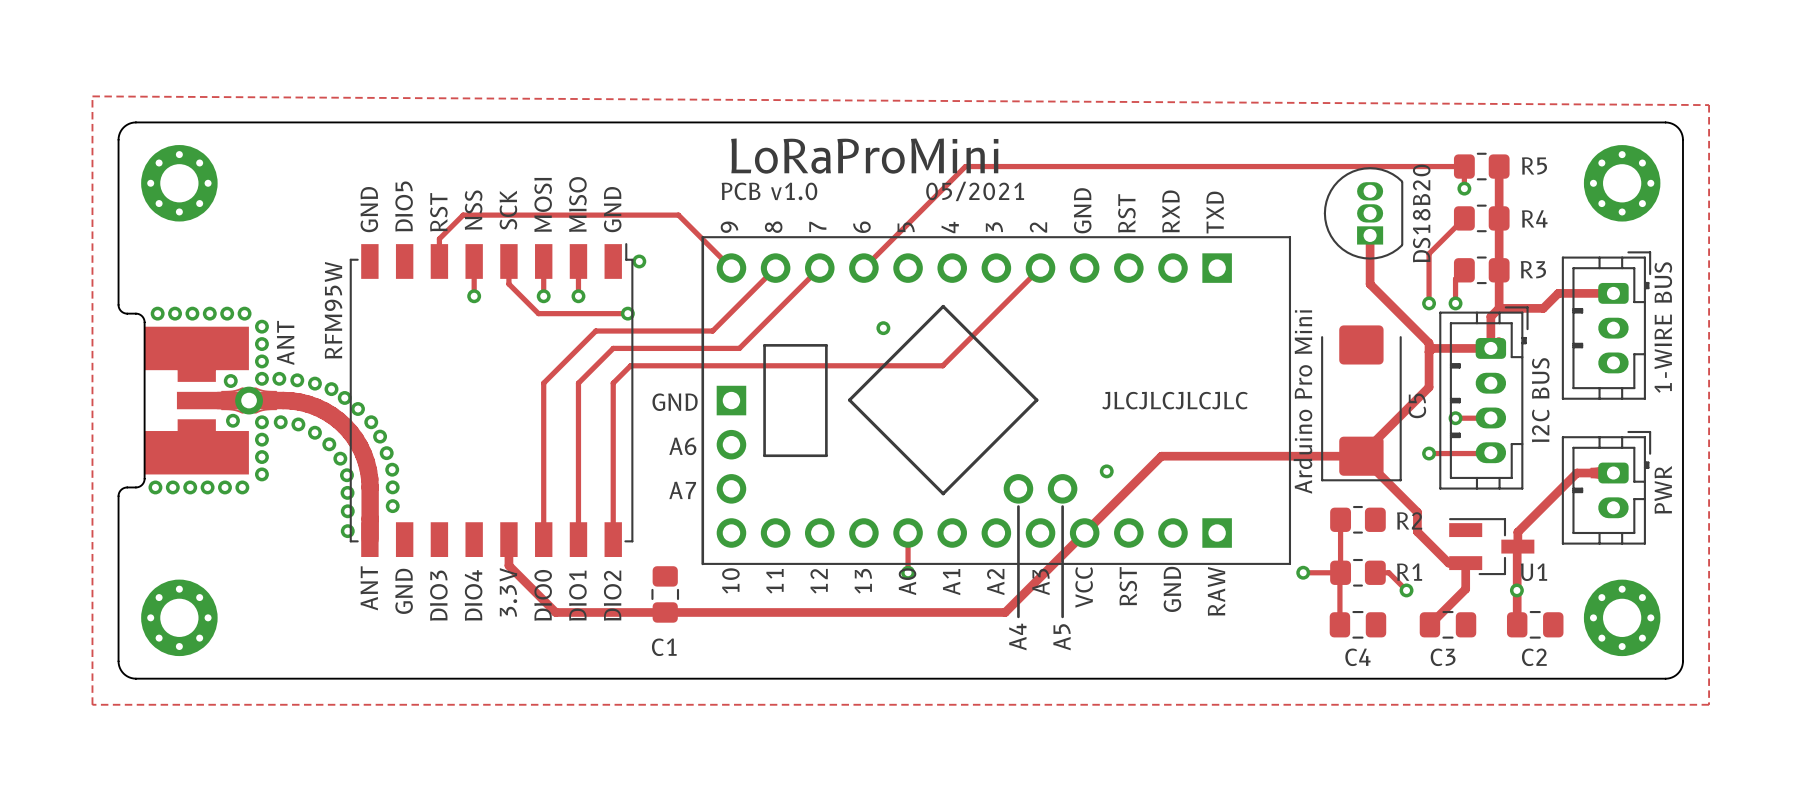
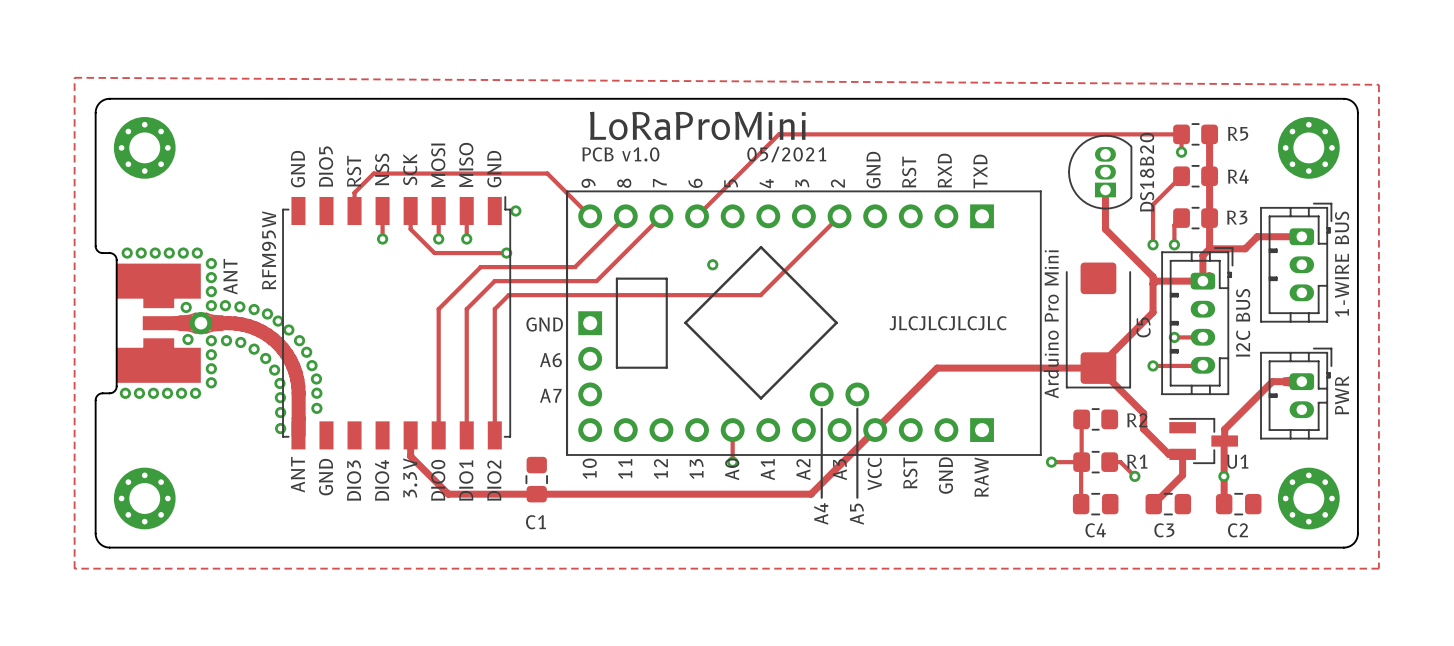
via: (1106, 471) -> none

